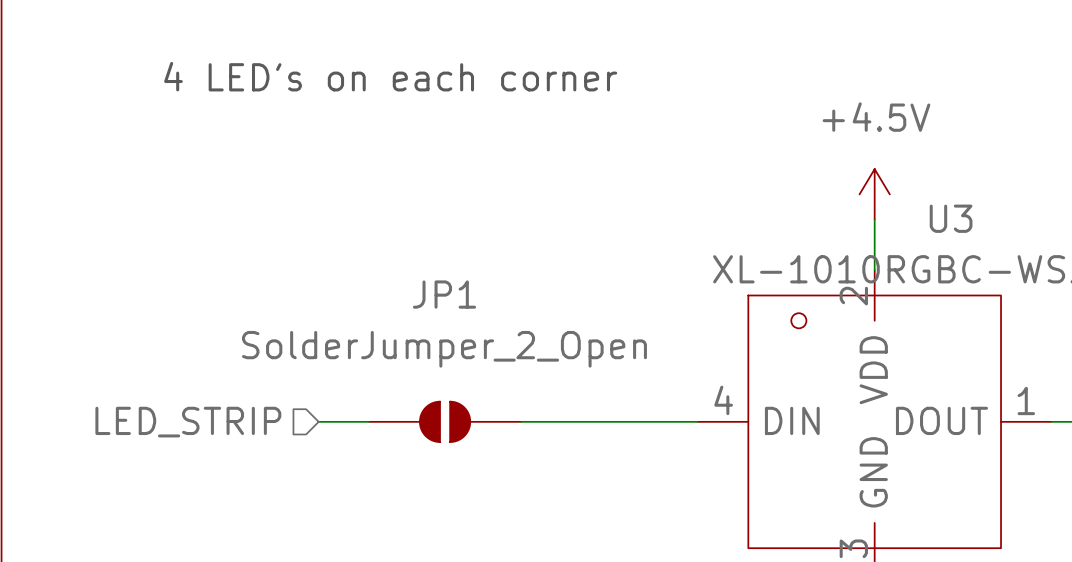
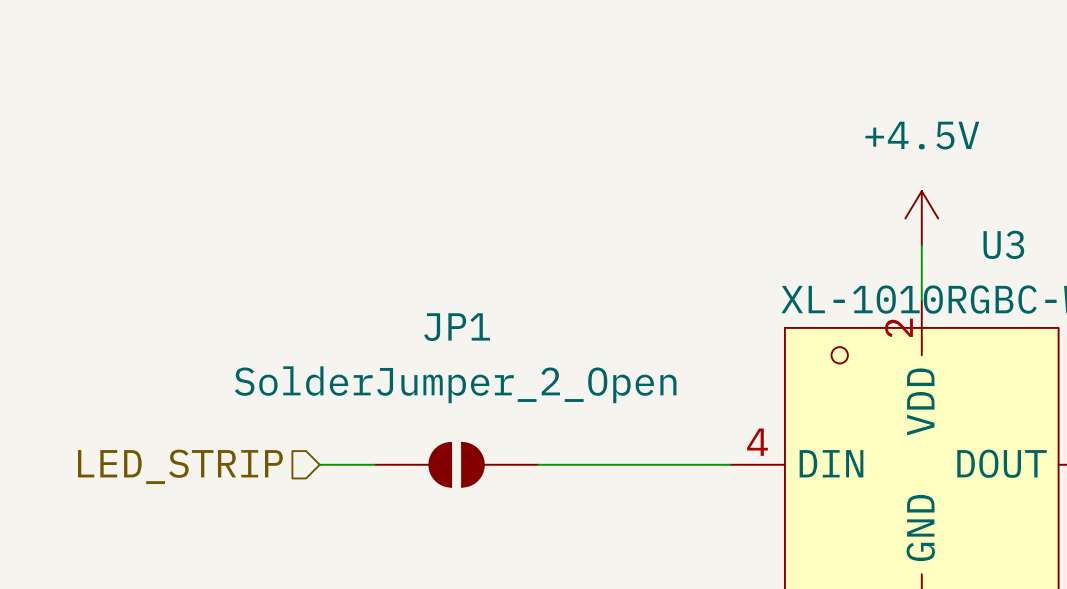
text: 4 LED's on each corner (390, 76) -> none

